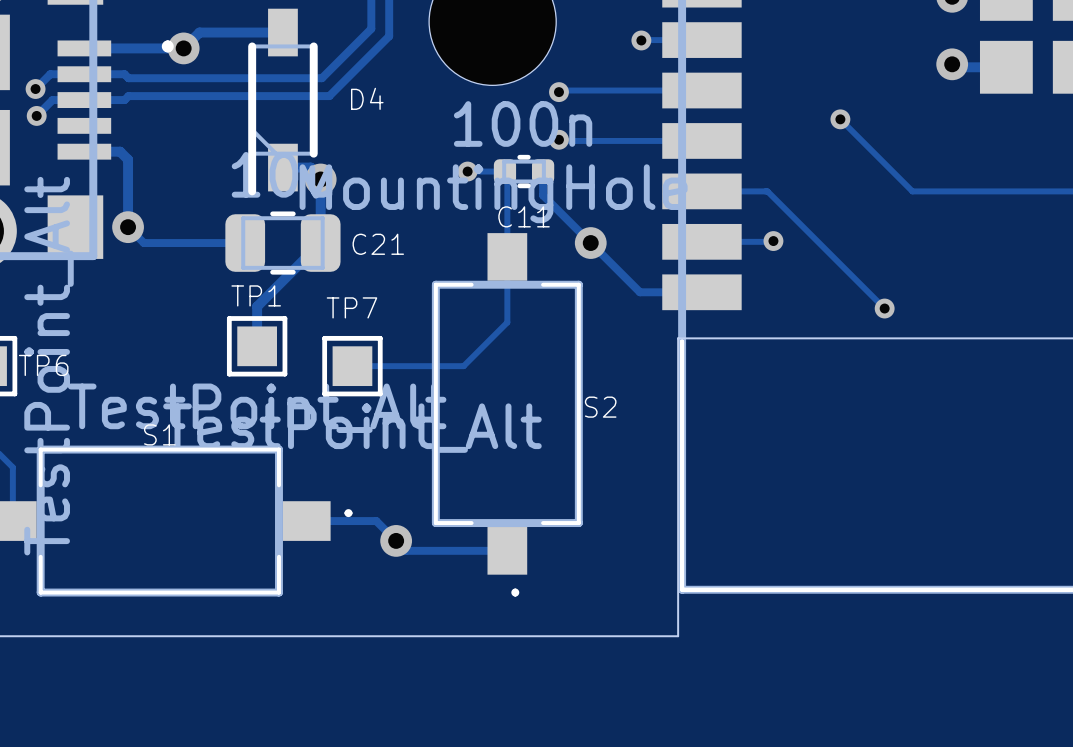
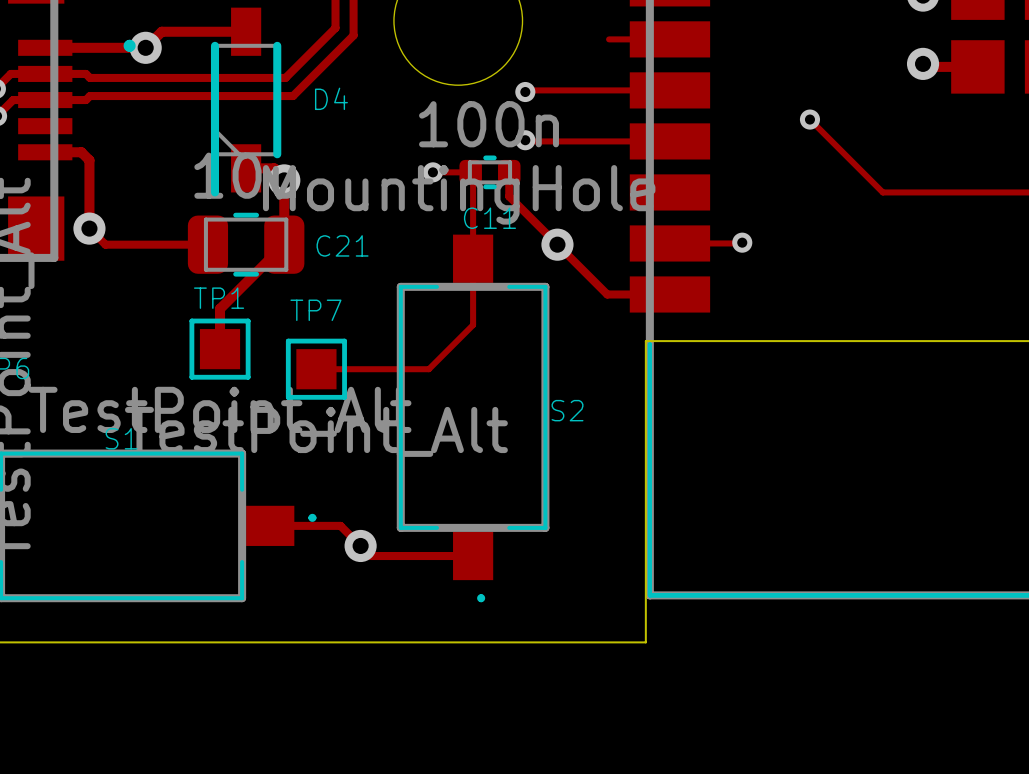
via: (641, 40) -> none
track: (701, 191) (767, 191) (884, 308) -> none
via: (884, 308) -> none

